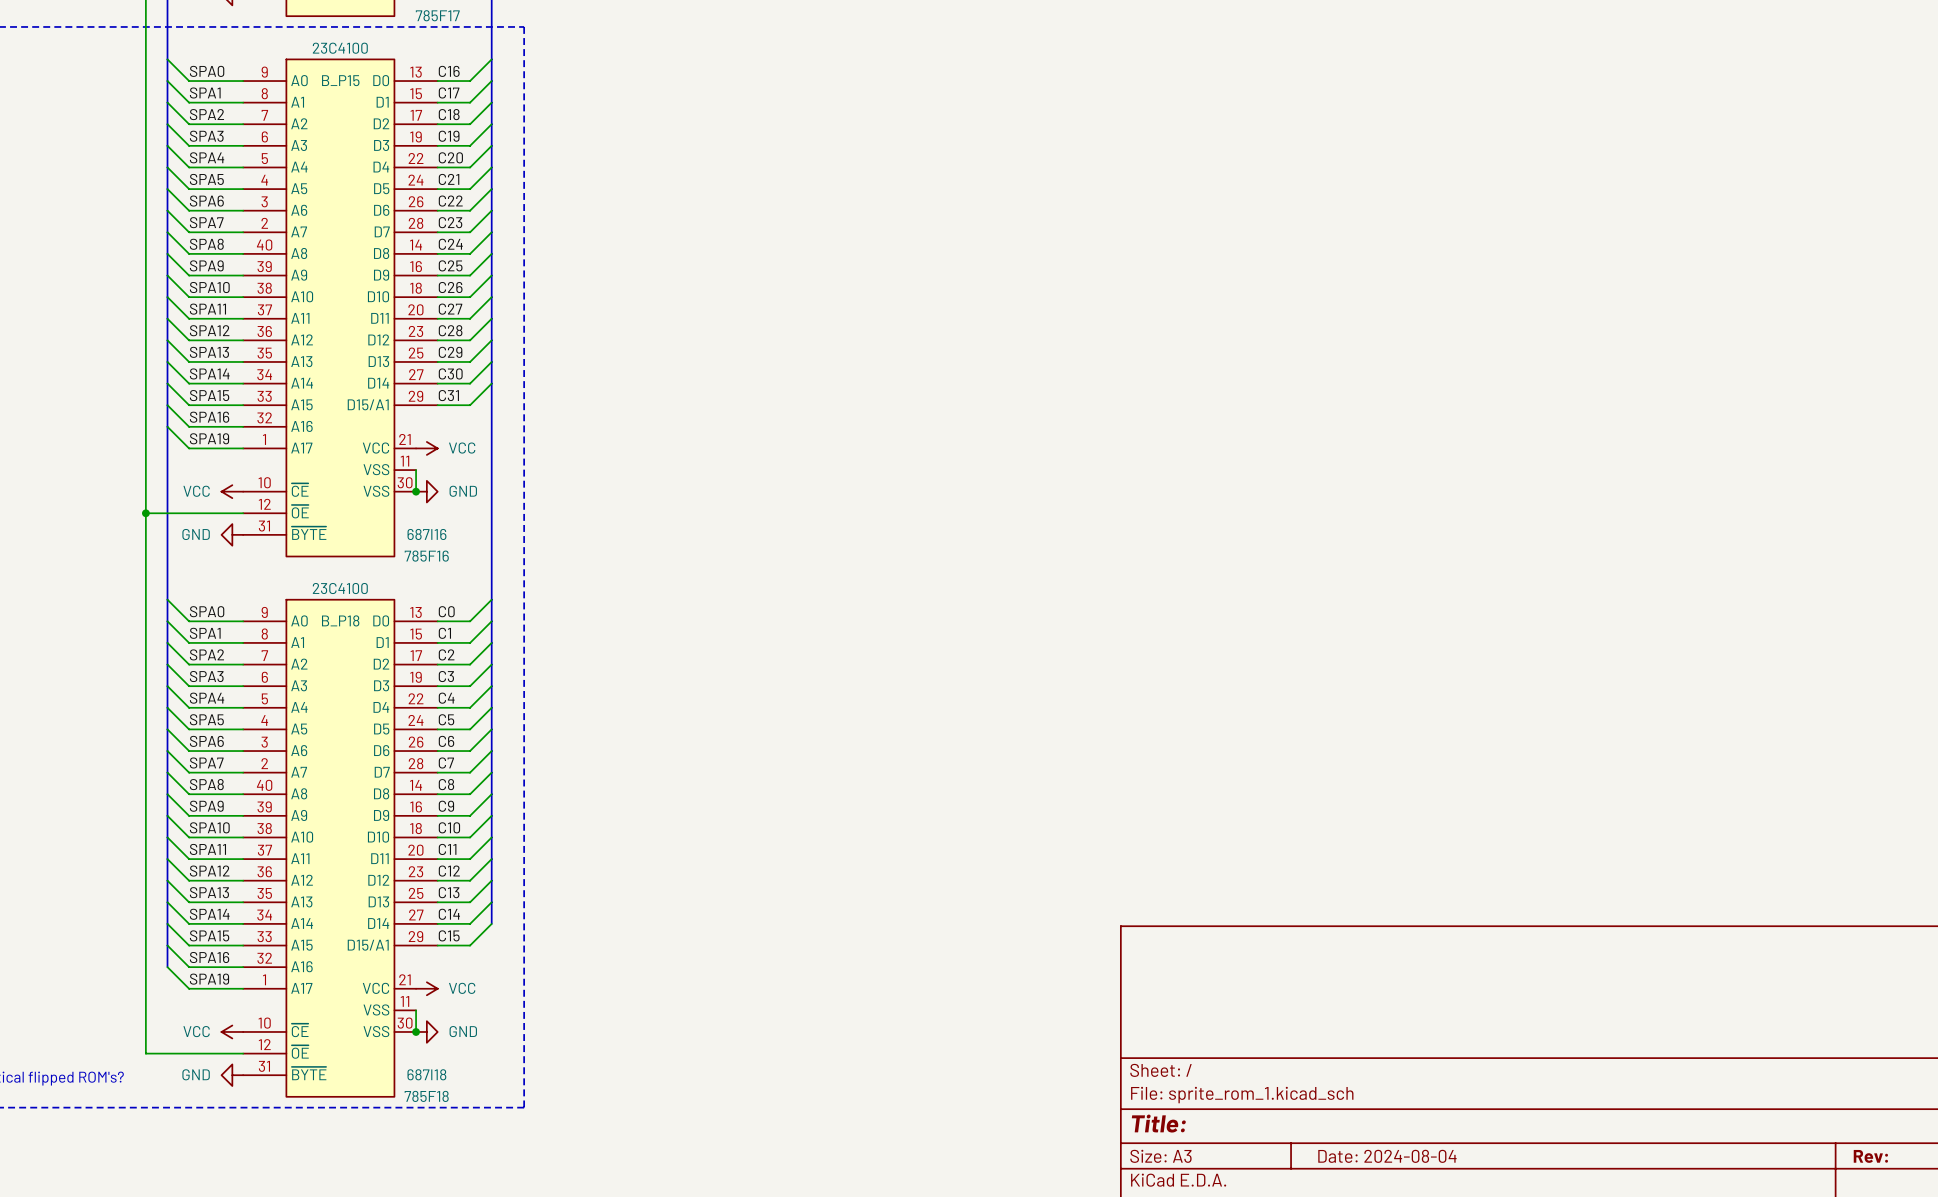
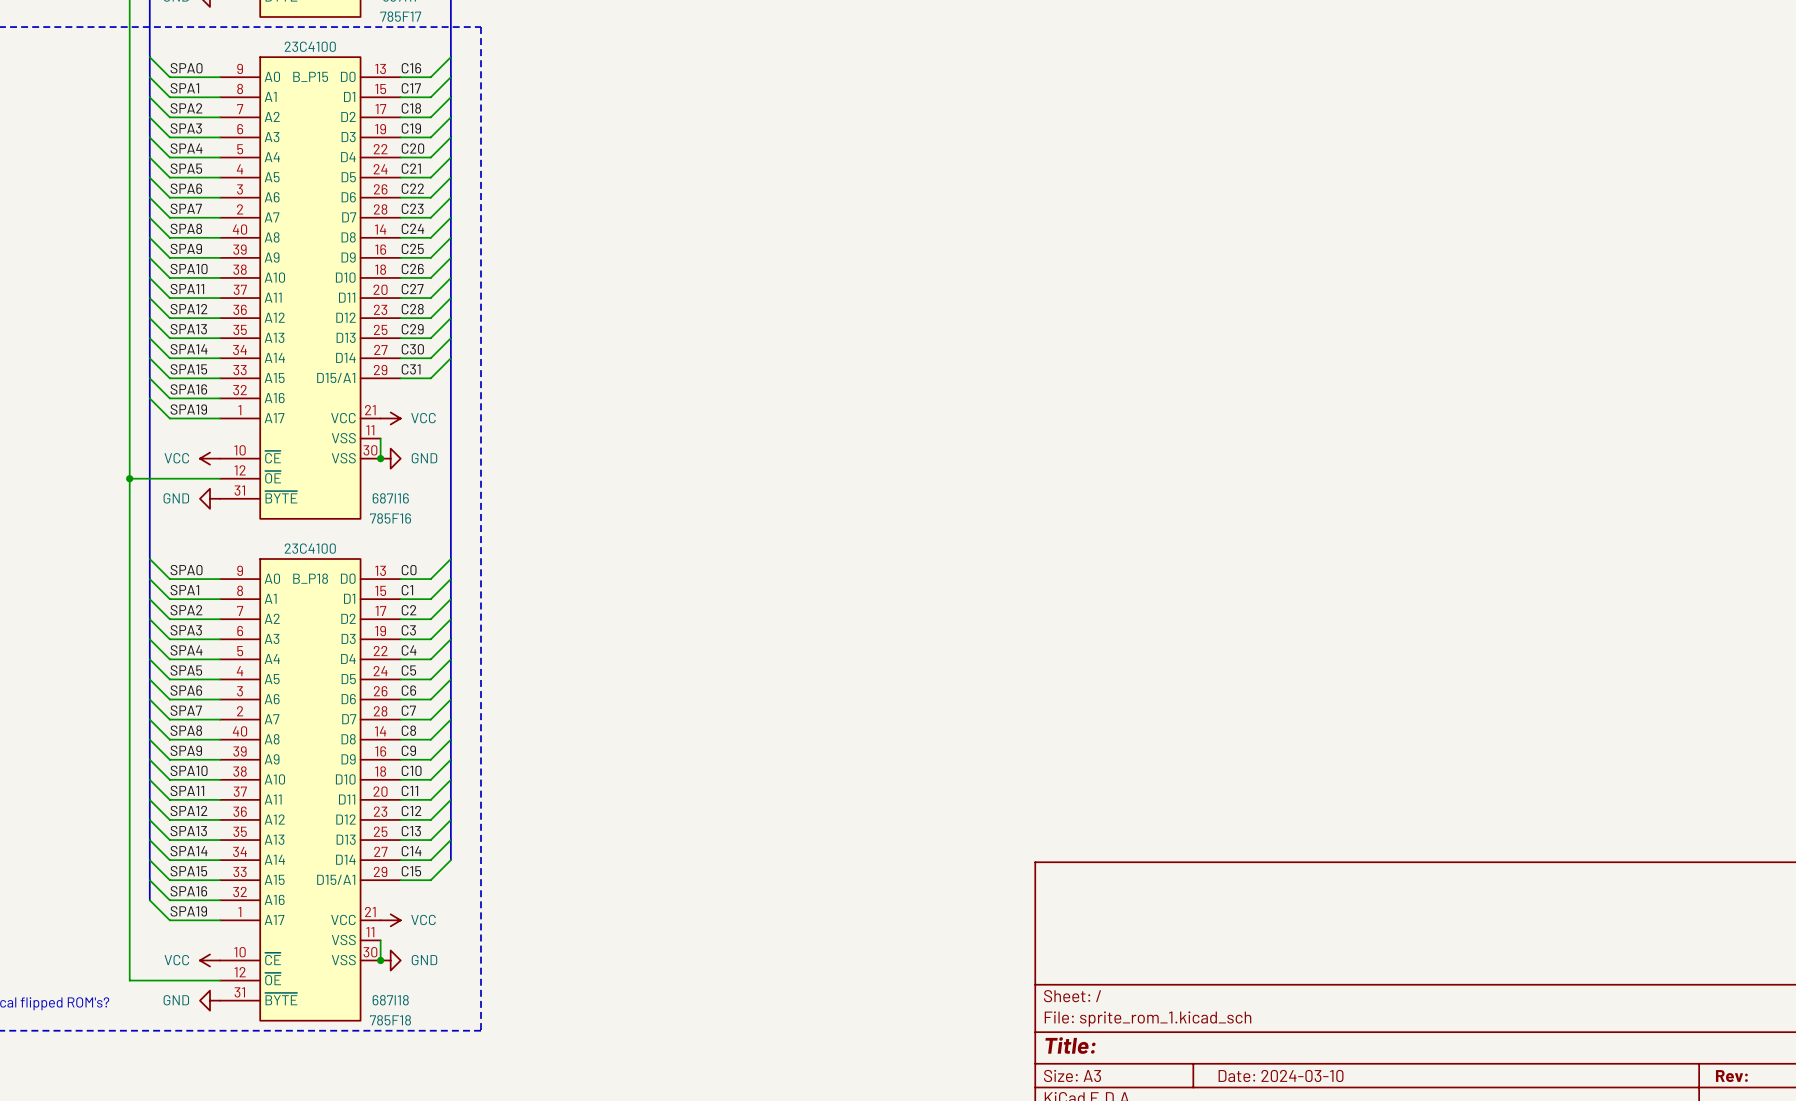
title block: Date: 2024-08-04 (1387, 1156) -> Date: 2024-03-10 (1281, 1075)

